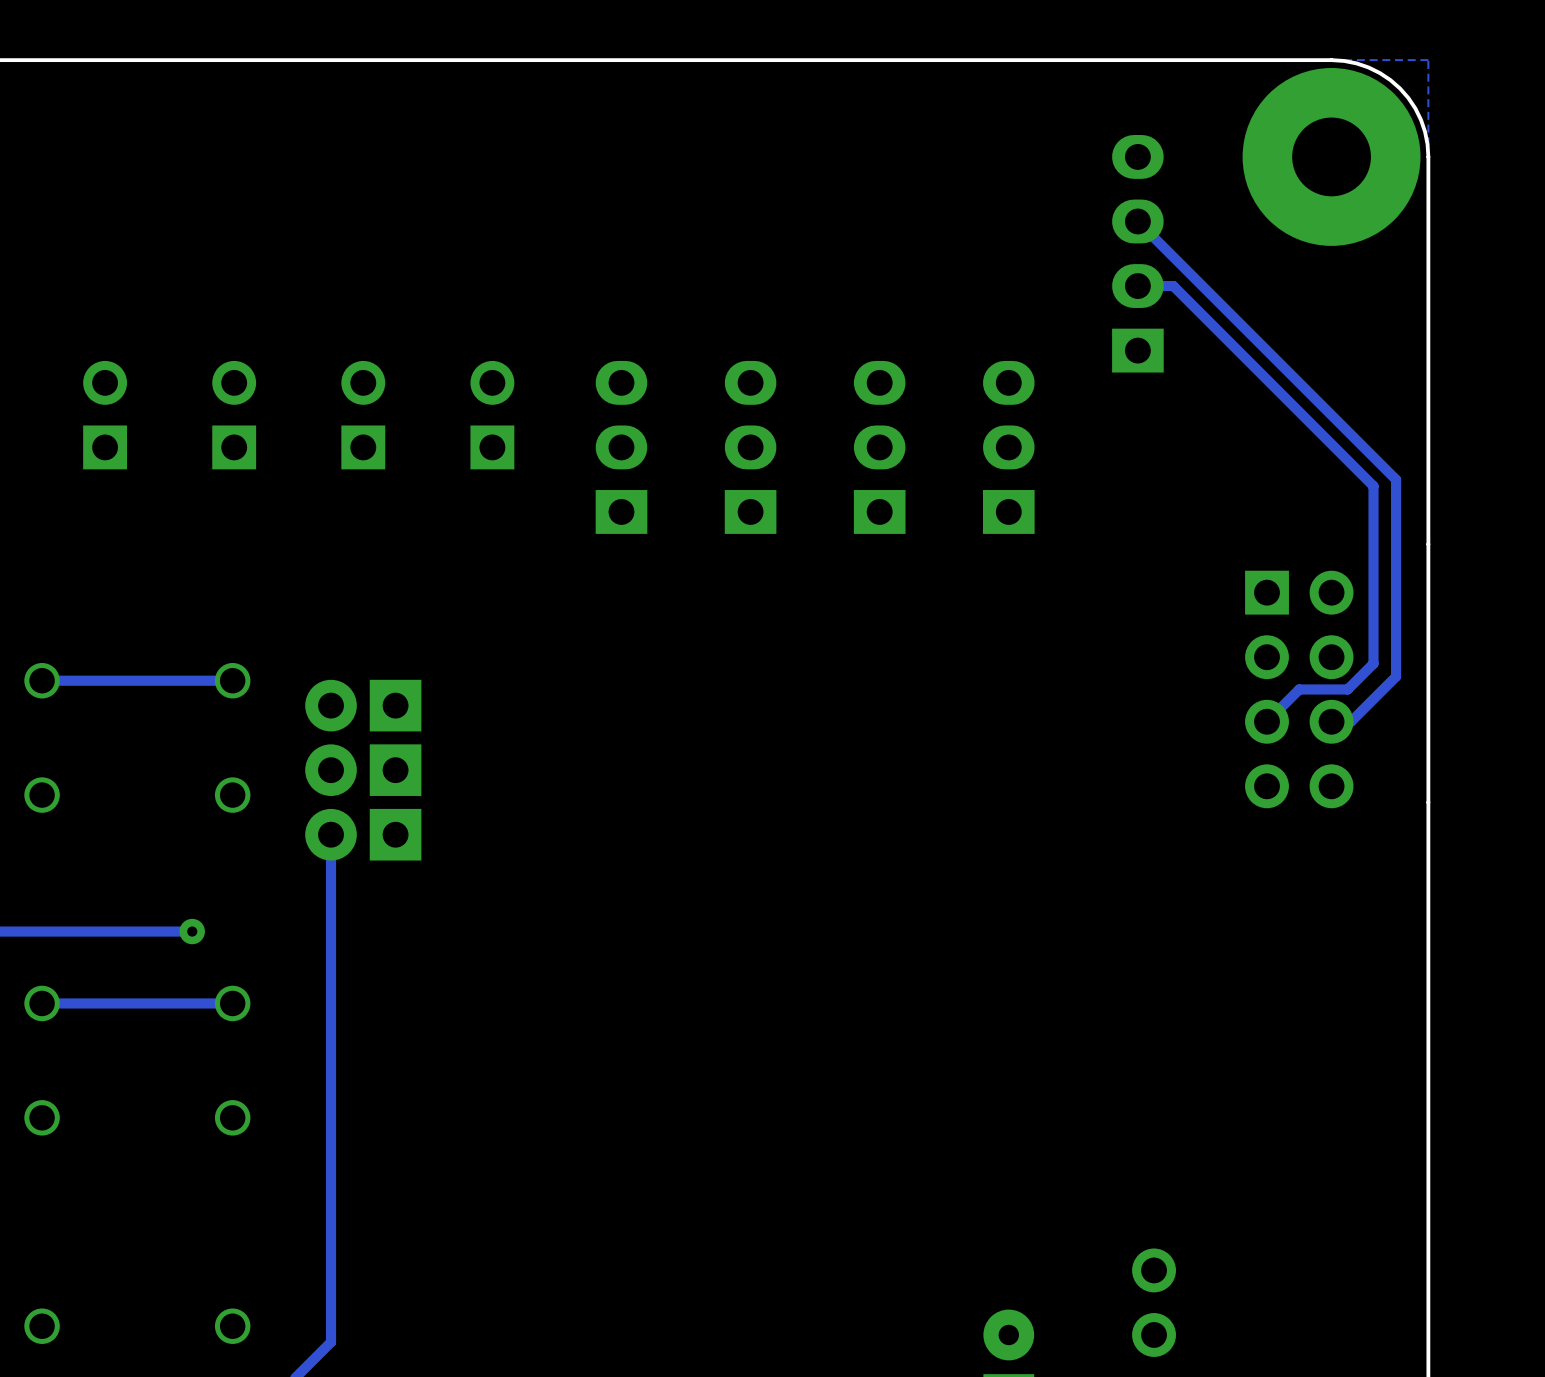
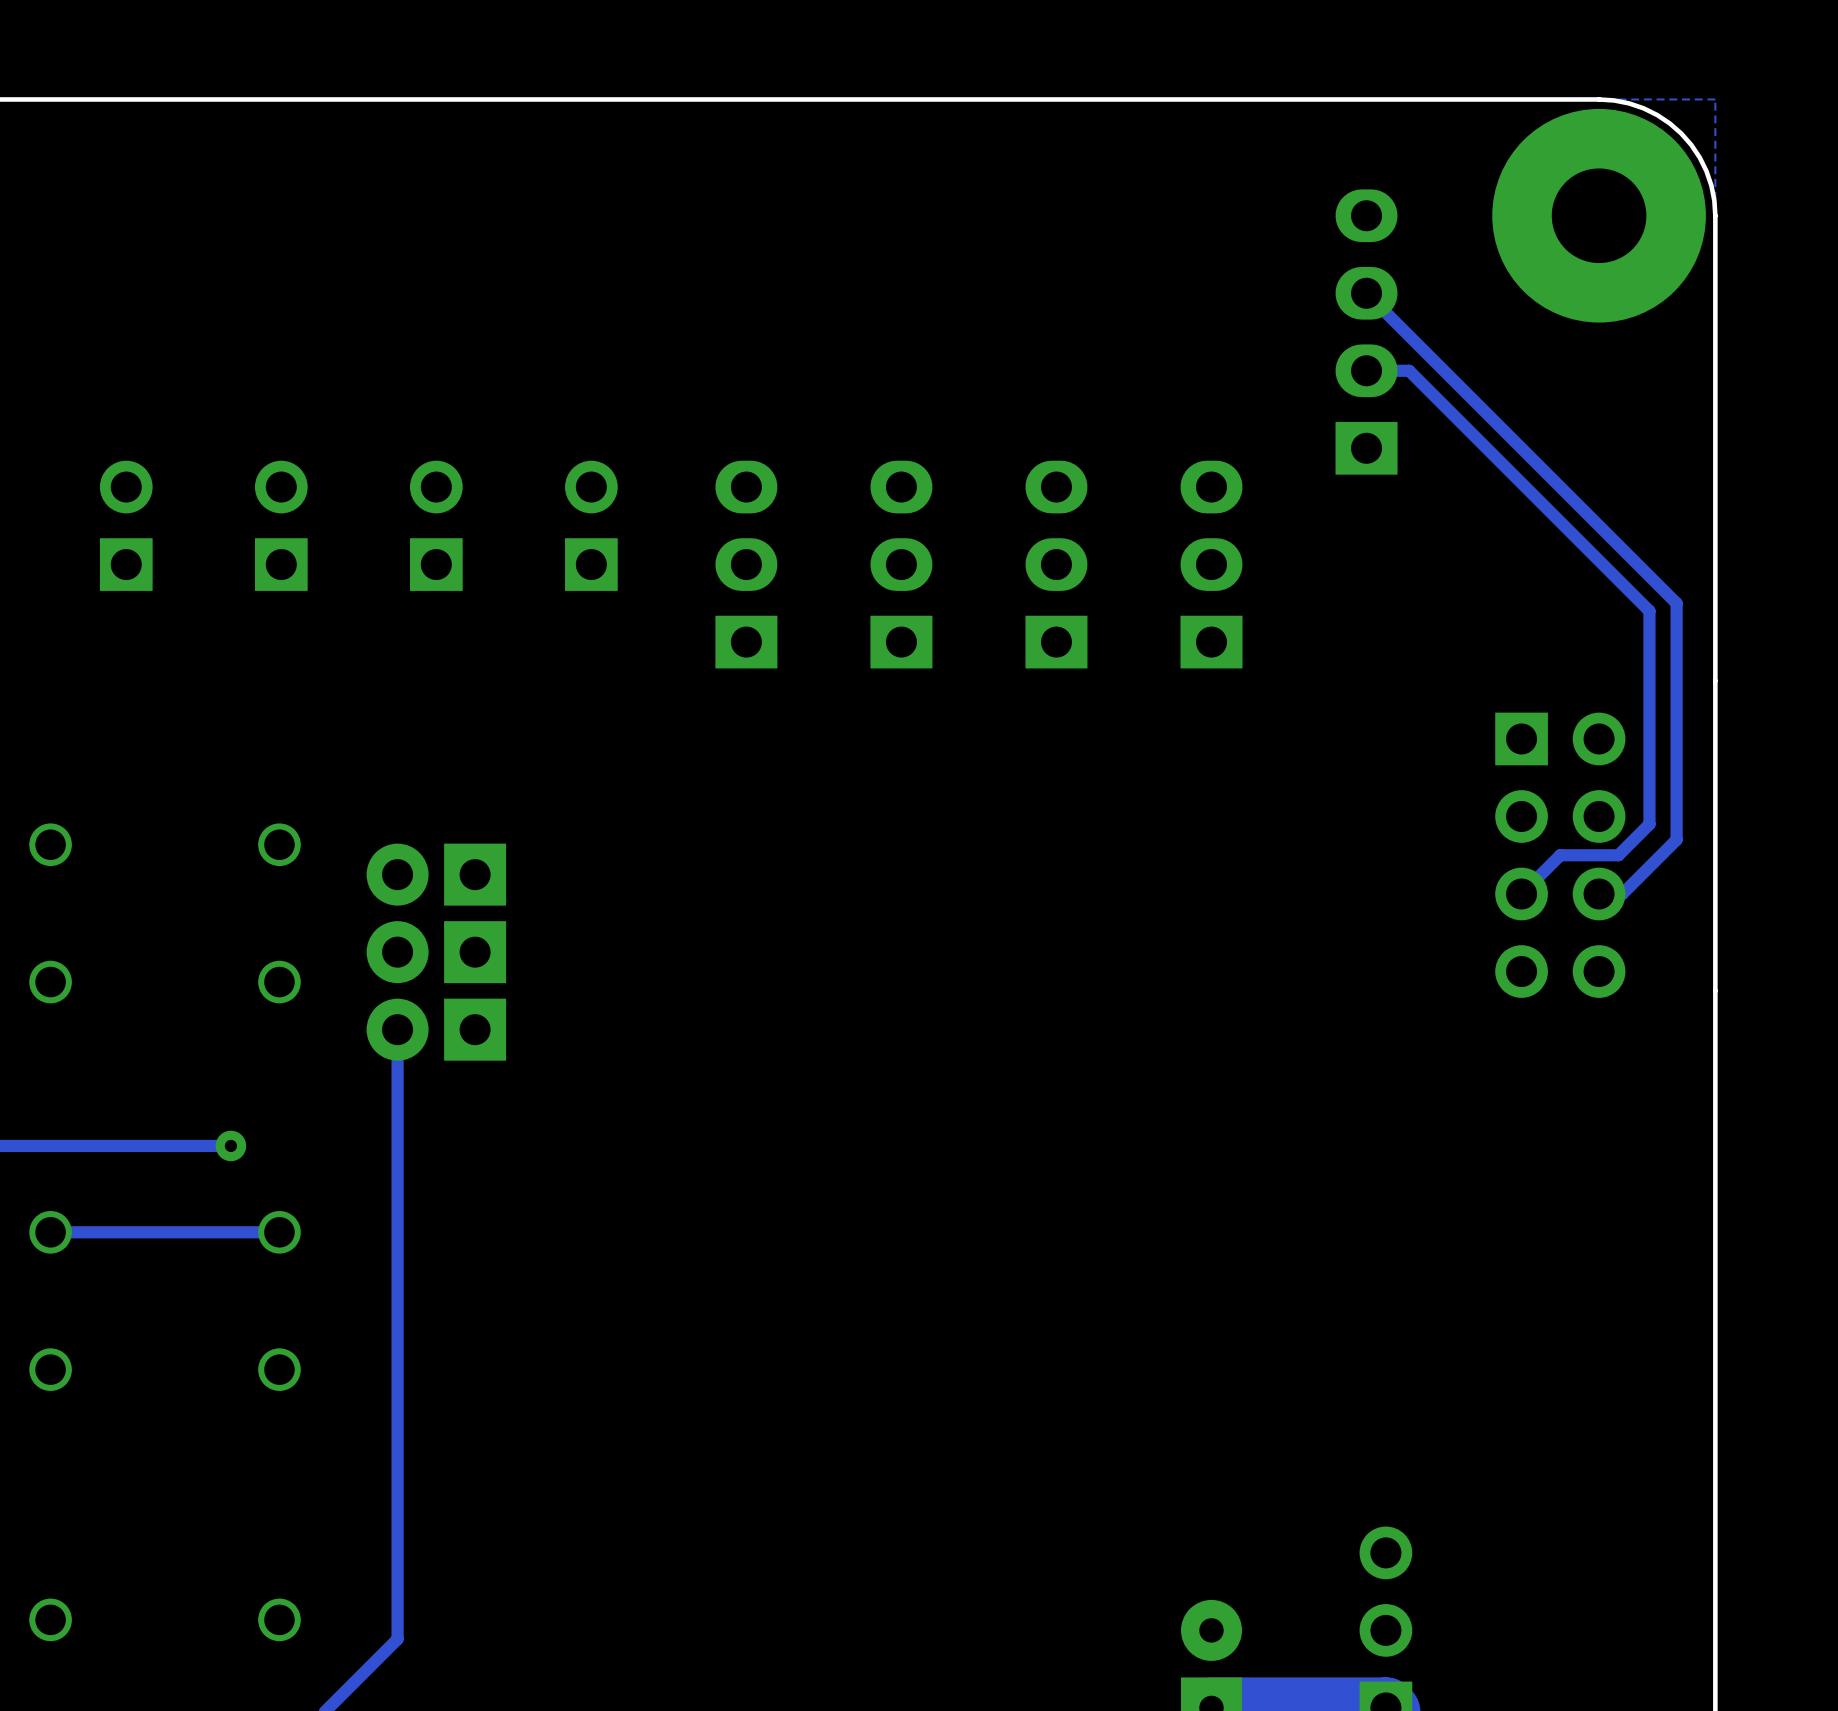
track: (232, 680) (42, 680) -> none

